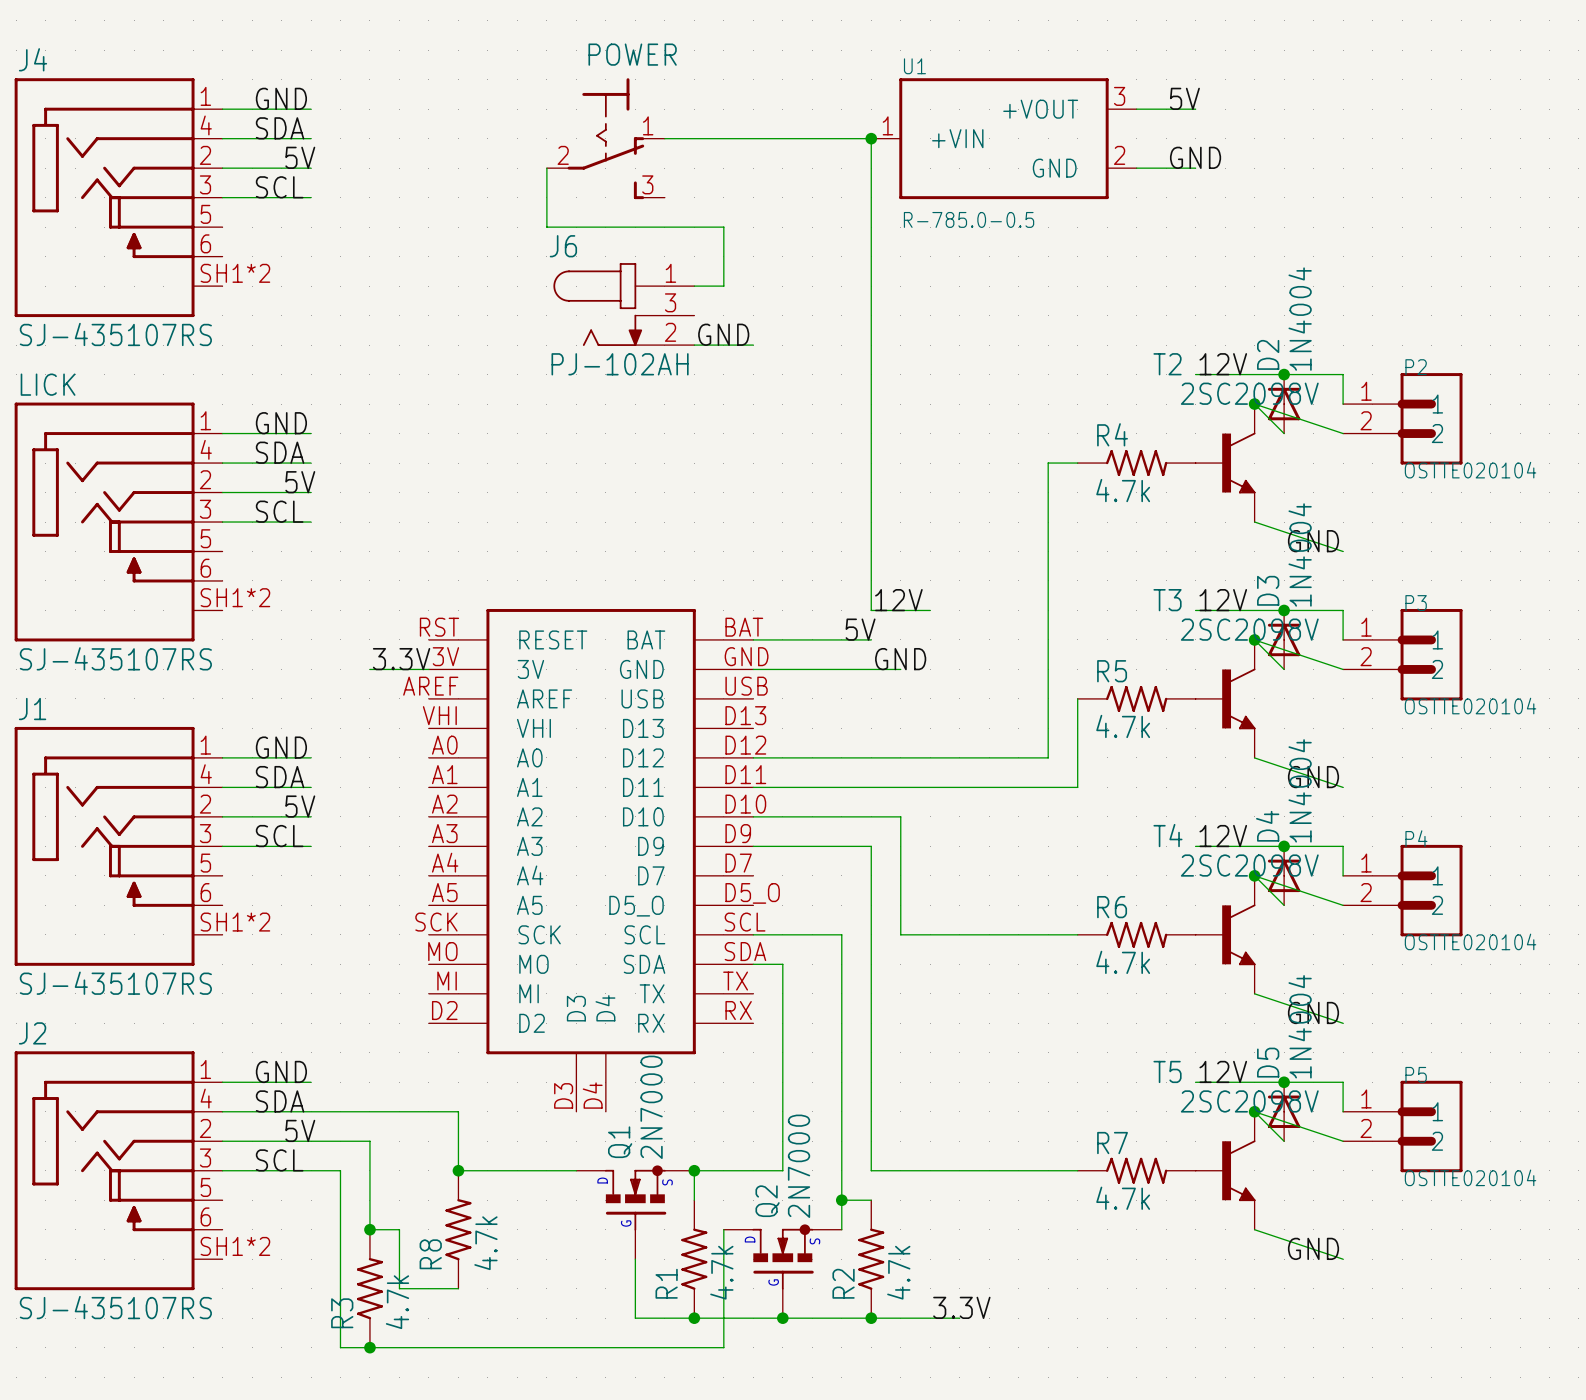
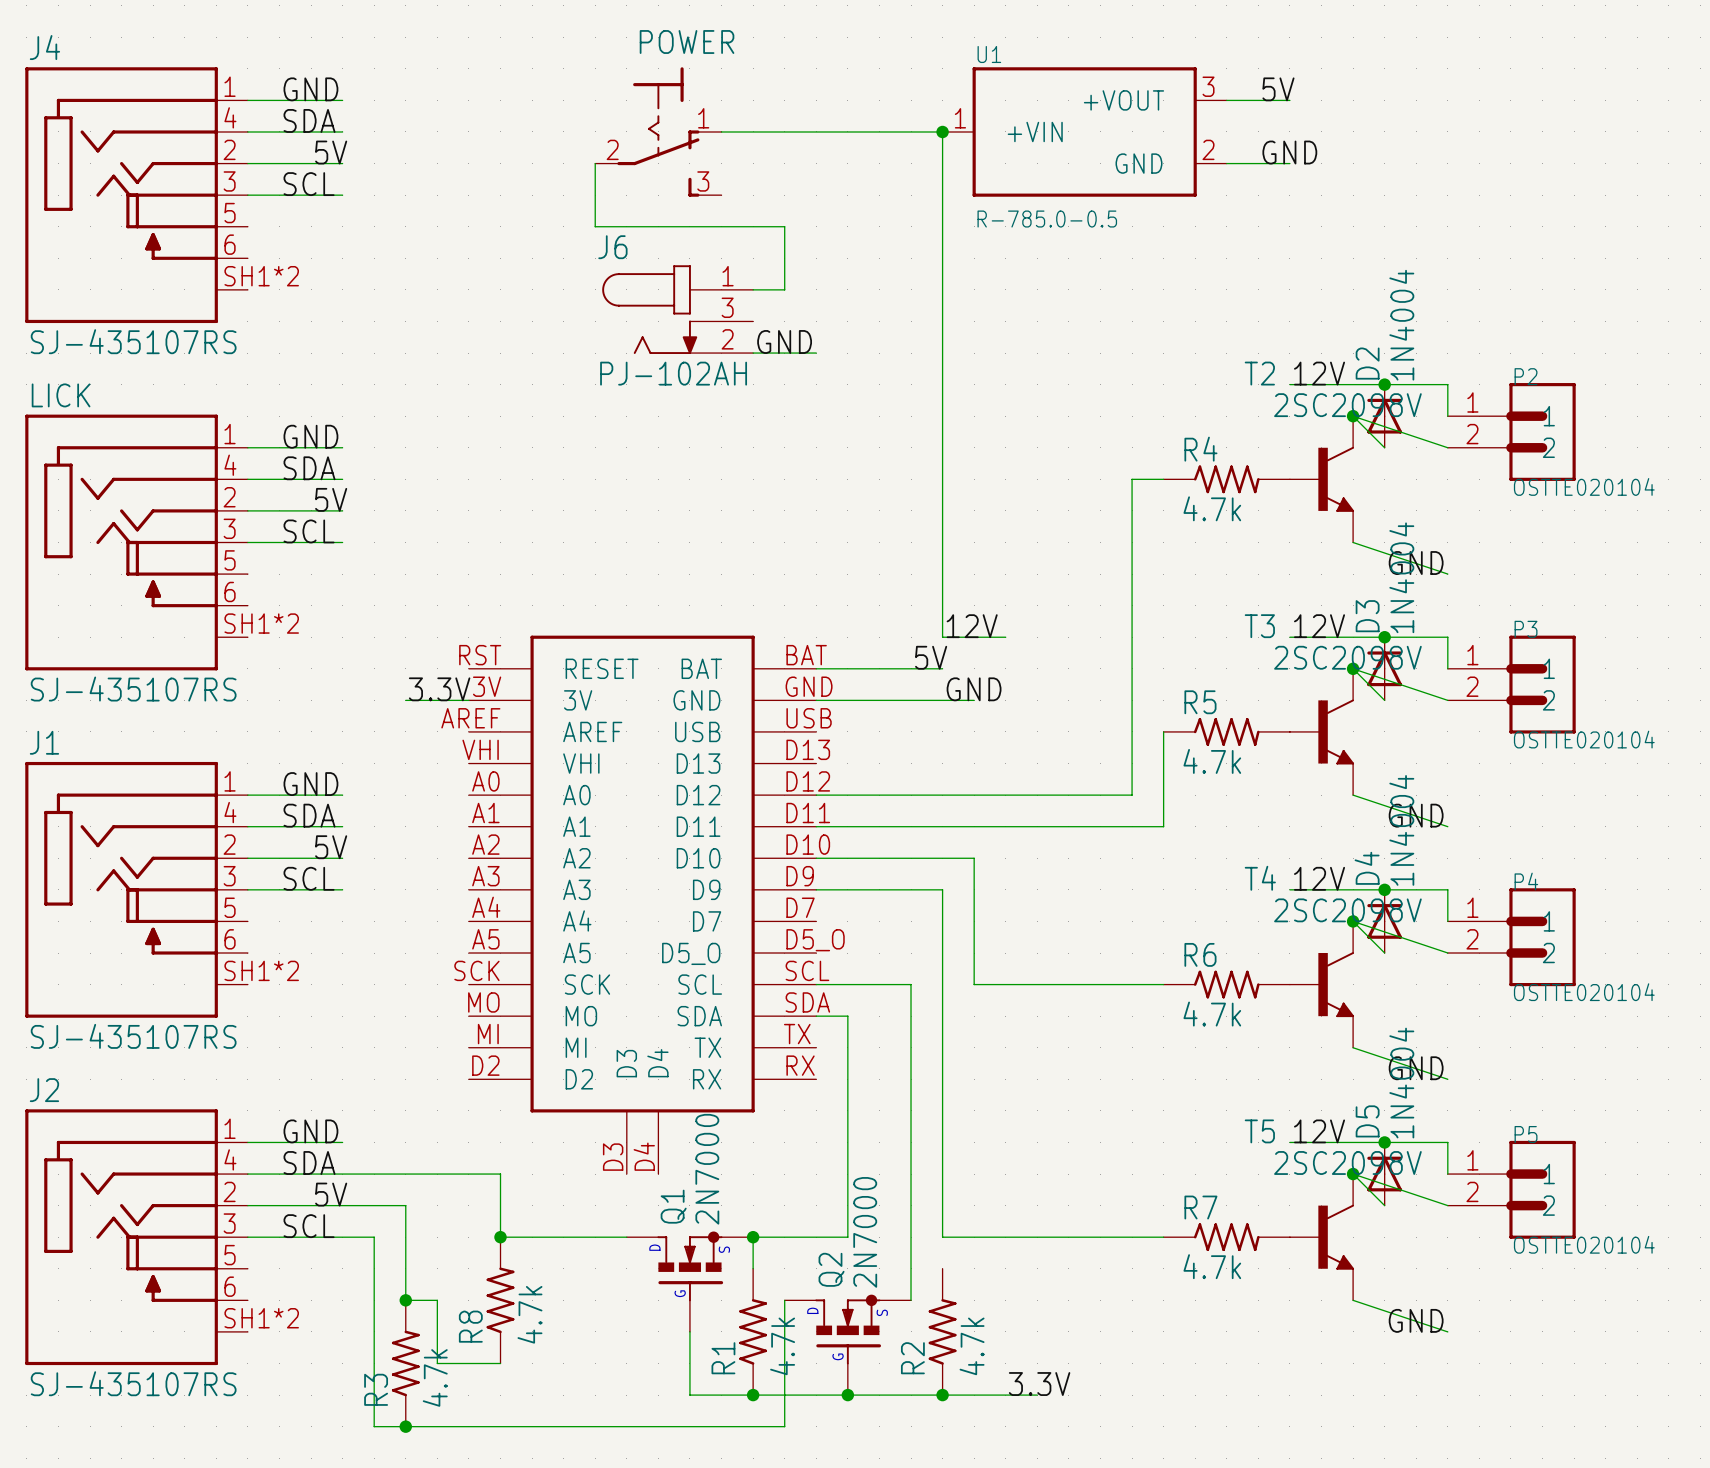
wire: (841, 1200) (871, 1200) -> none
junction: (841, 1200) -> none

